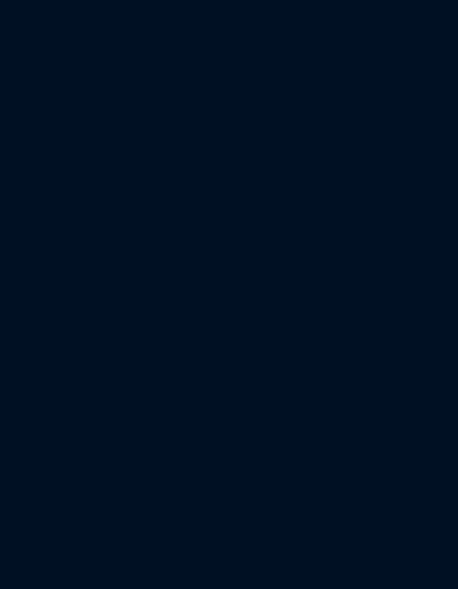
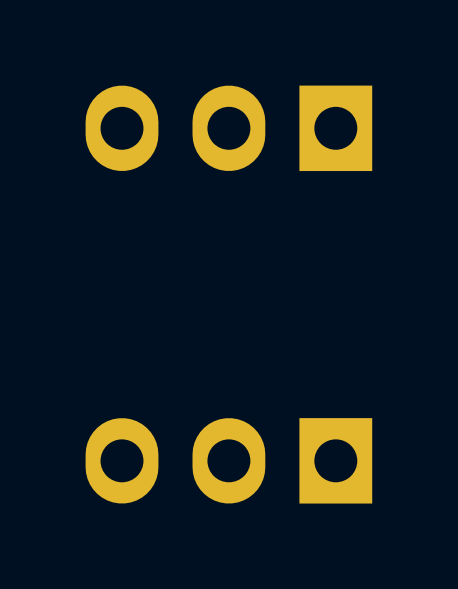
part: none -> (228, 128)
part: none -> (228, 460)

